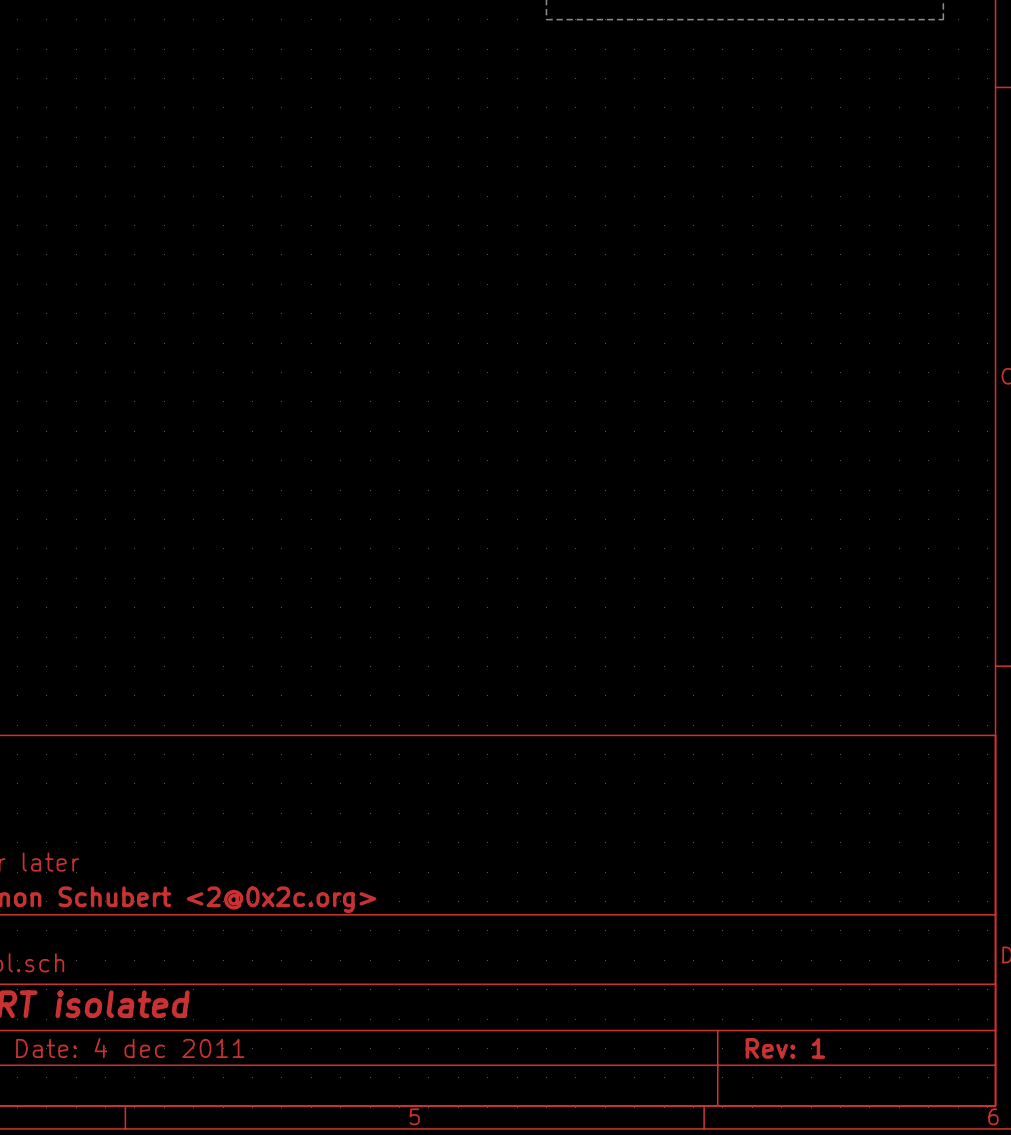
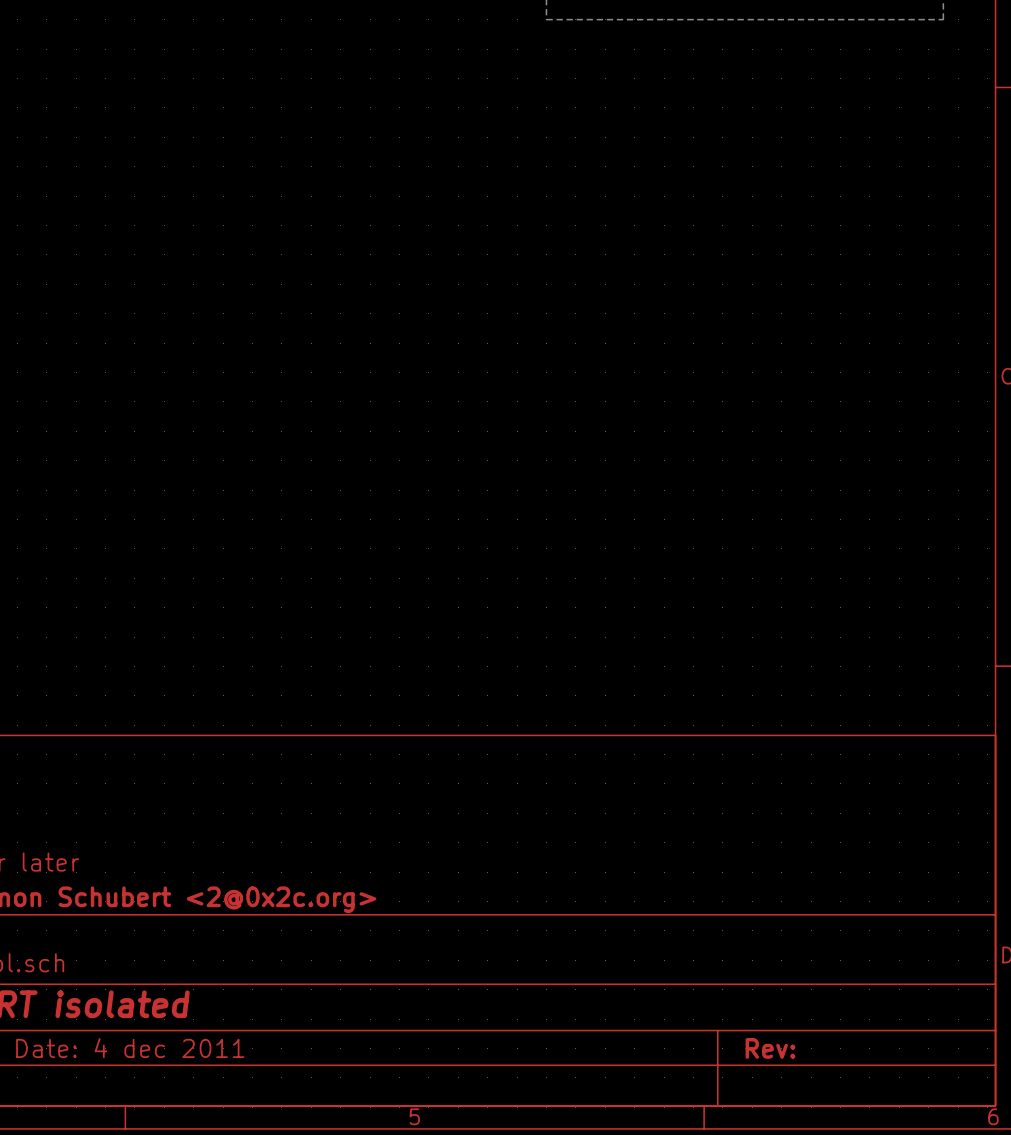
title block: Rev: 1 (785, 1048) -> Rev: (770, 1048)

